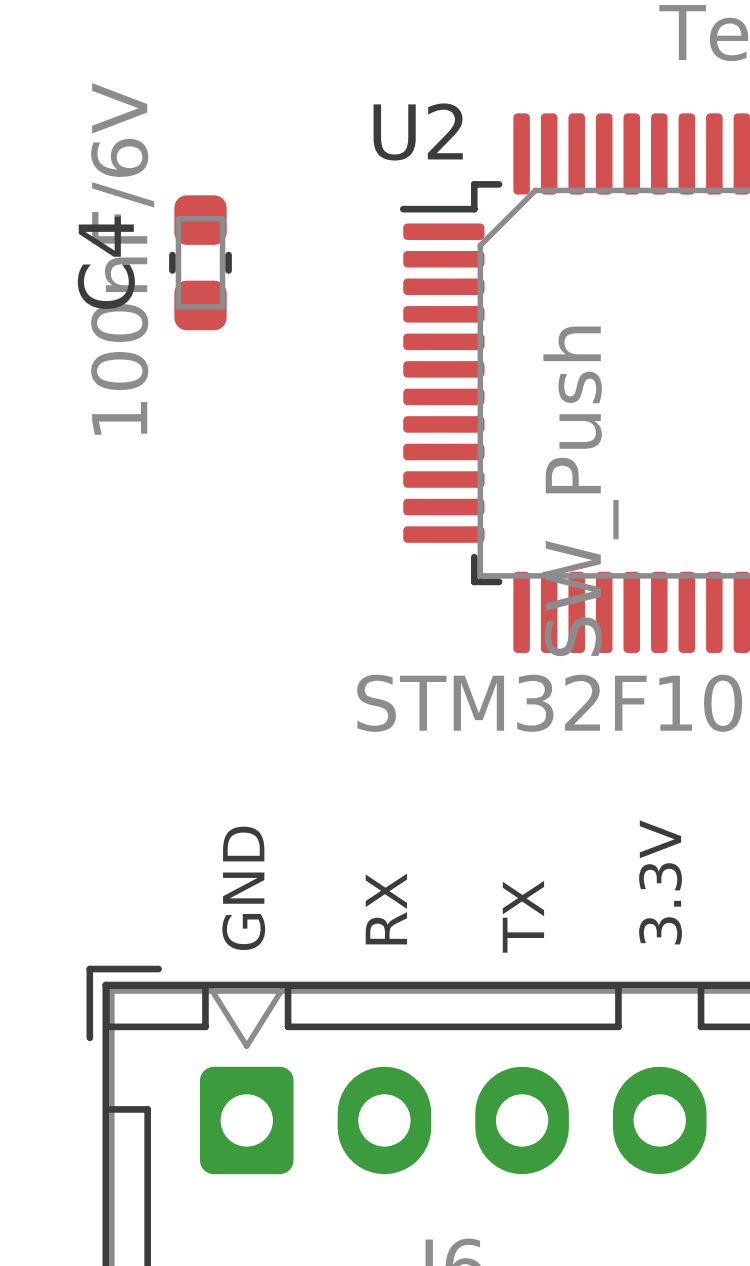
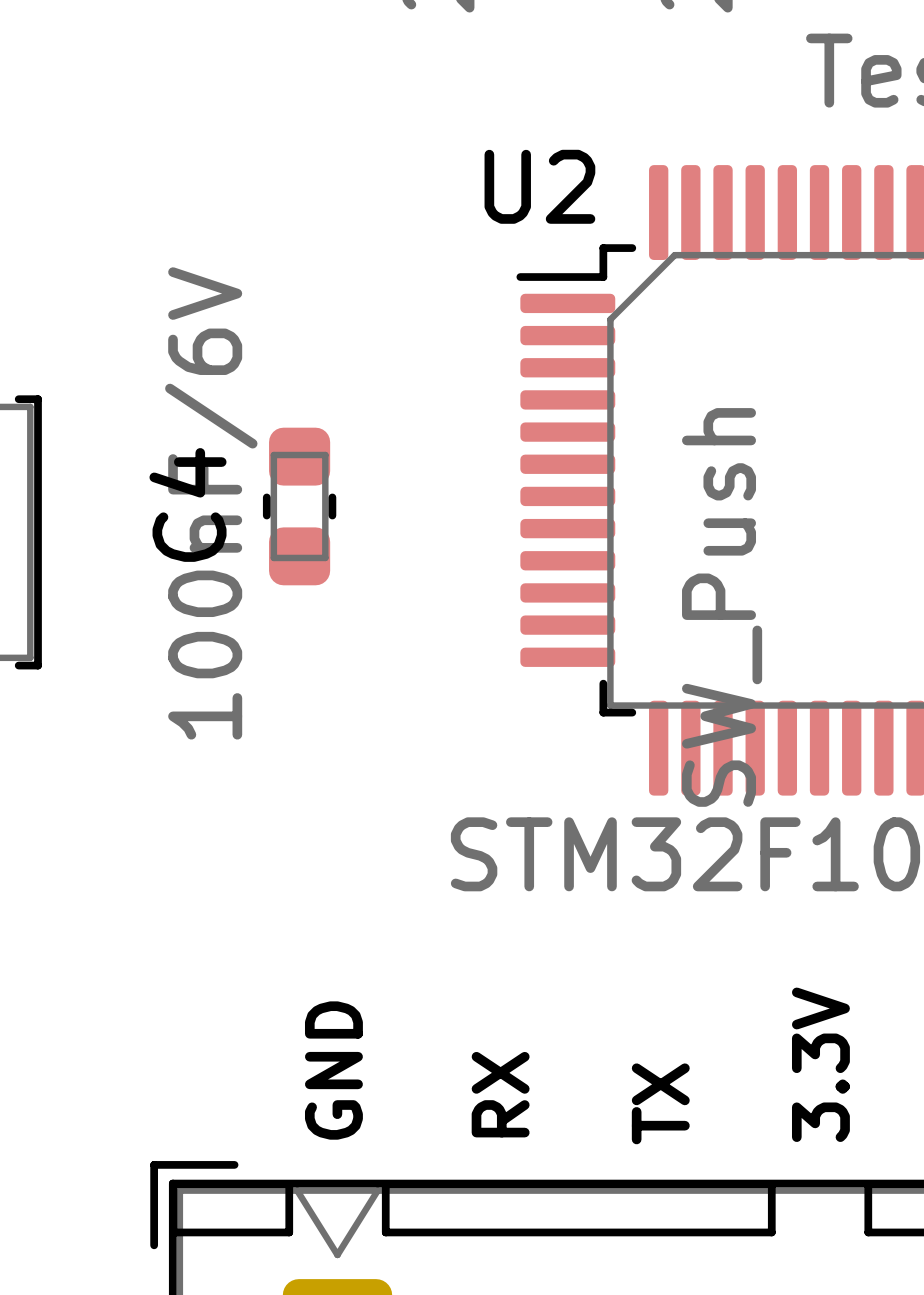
C4 position: (200, 262) -> (299, 506)

